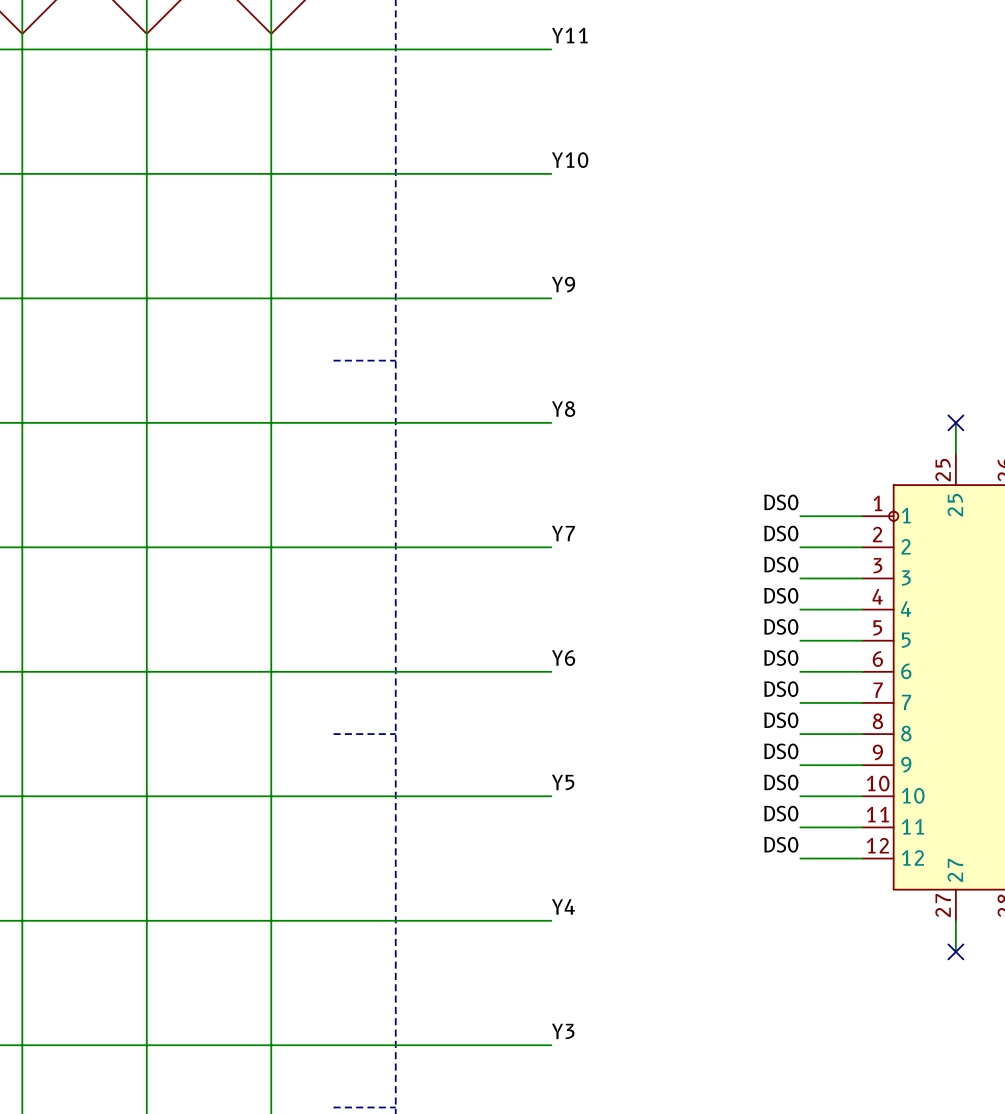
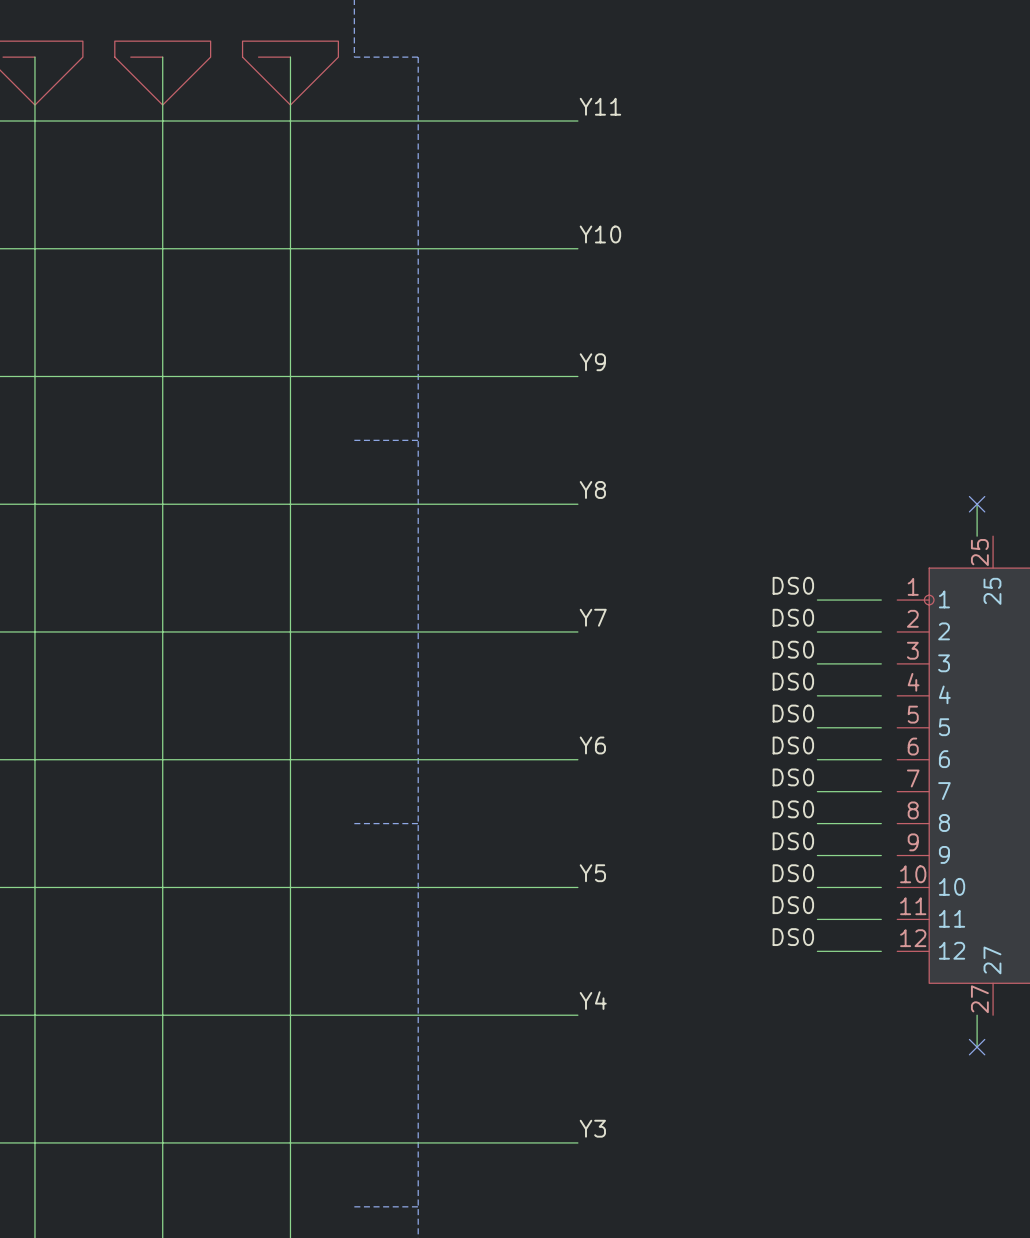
wire: (955, 422) (955, 453) -> (977, 504) (977, 536)
no-connect mark position: (955, 422) -> (977, 504)
label position: DS0 (781, 502) -> DS0 (793, 585)
wire: (846, 516) (862, 516) -> (817, 600) (833, 600)
label position: DS0 (781, 533) -> DS0 (793, 617)
wire: (846, 547) (862, 547) -> (817, 631) (833, 631)
label position: DS0 (781, 564) -> DS0 (793, 649)
wire: (846, 578) (862, 578) -> (817, 663) (833, 663)
label position: DS0 (781, 595) -> DS0 (793, 681)
wire: (846, 609) (862, 609) -> (817, 695) (833, 695)
label position: DS0 (781, 626) -> DS0 (793, 713)
wire: (846, 640) (862, 640) -> (817, 727) (833, 727)
label position: DS0 (781, 658) -> DS0 (793, 745)
wire: (846, 671) (862, 671) -> (817, 759) (833, 759)
label position: DS0 (781, 689) -> DS0 (793, 777)
wire: (846, 702) (862, 702) -> (817, 791) (833, 791)
label position: DS0 (781, 720) -> DS0 (793, 809)
wire: (846, 734) (862, 734) -> (817, 823) (833, 823)
label position: DS0 (781, 751) -> DS0 (793, 841)
wire: (846, 765) (862, 765) -> (817, 855) (833, 855)
label position: DS0 (781, 782) -> DS0 (793, 873)
wire: (846, 796) (862, 796) -> (817, 887) (833, 887)
label position: DS0 (781, 813) -> DS0 (793, 905)
wire: (846, 827) (862, 827) -> (817, 919) (833, 919)
label position: DS0 (781, 844) -> DS0 (793, 937)
wire: (846, 858) (862, 858) -> (817, 951) (833, 951)
wire: (955, 920) (955, 951) -> (977, 1015) (977, 1047)
no-connect mark position: (955, 951) -> (977, 1047)

